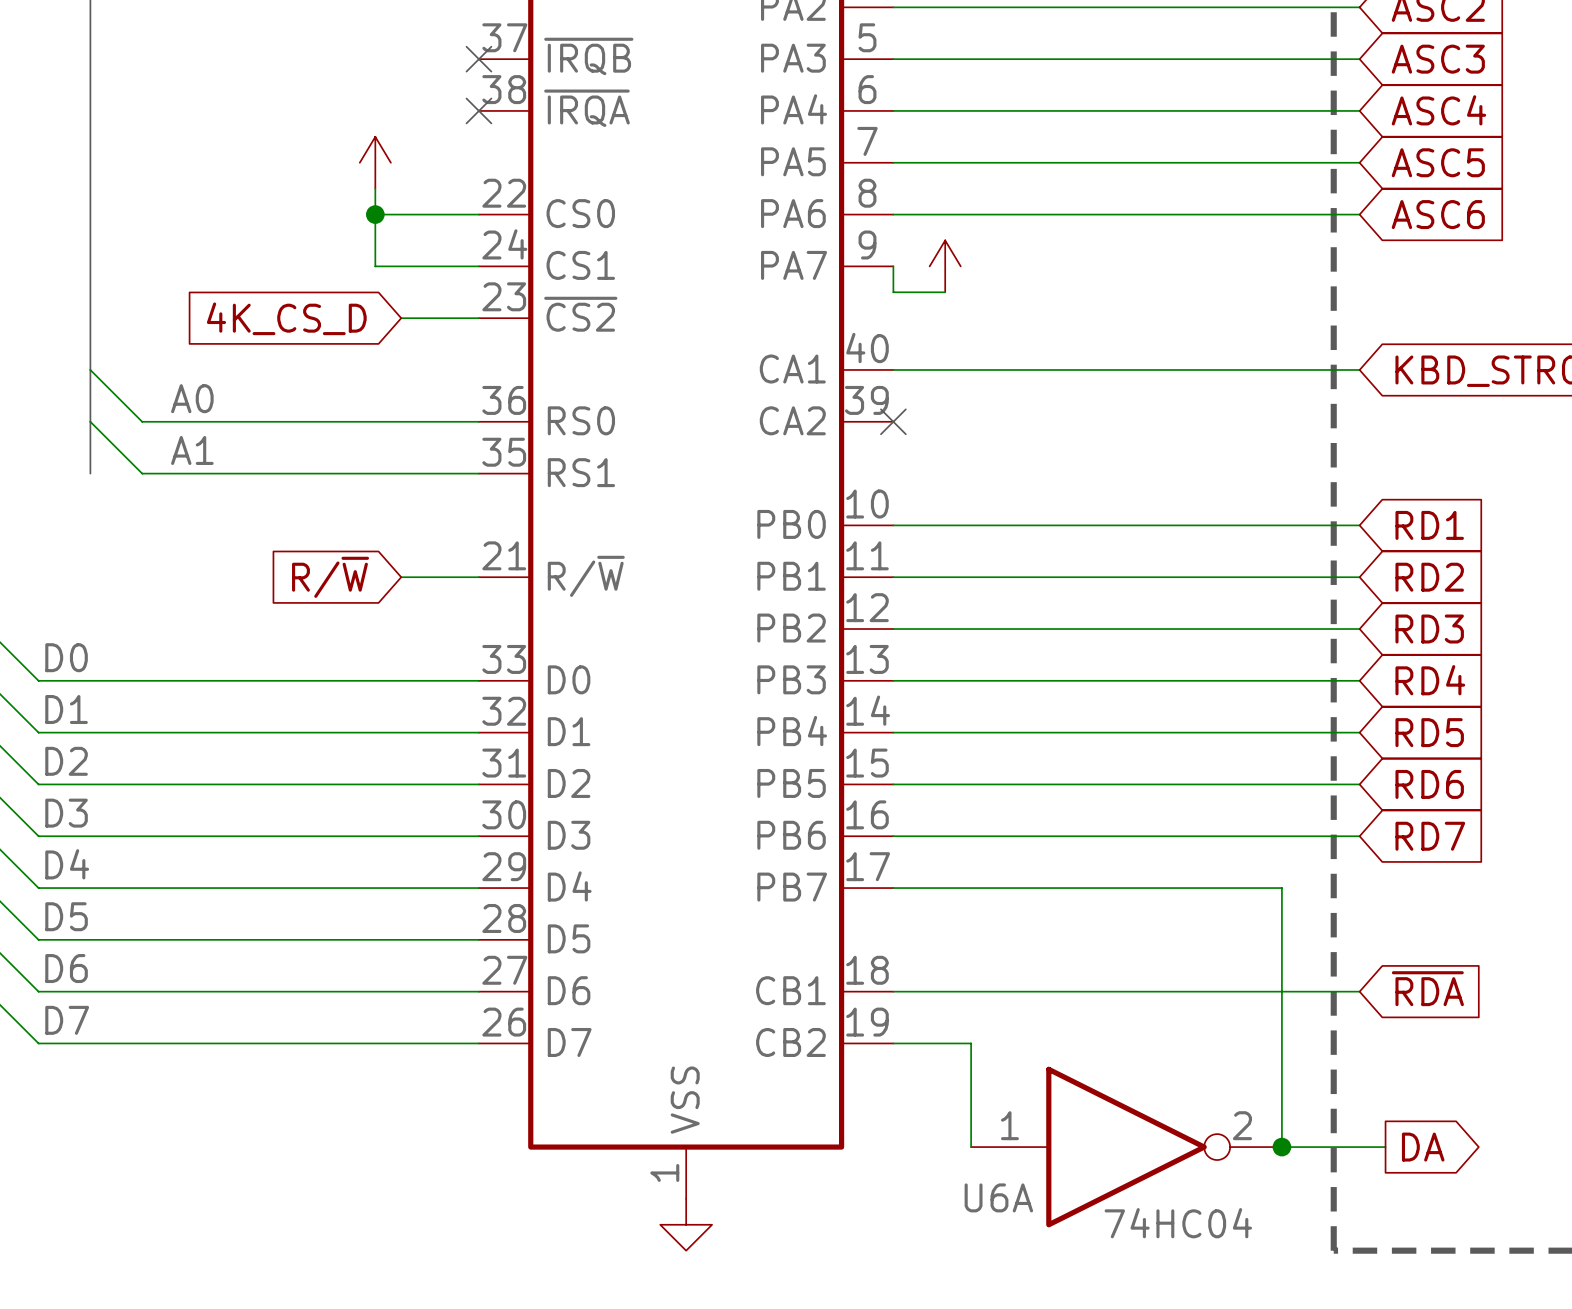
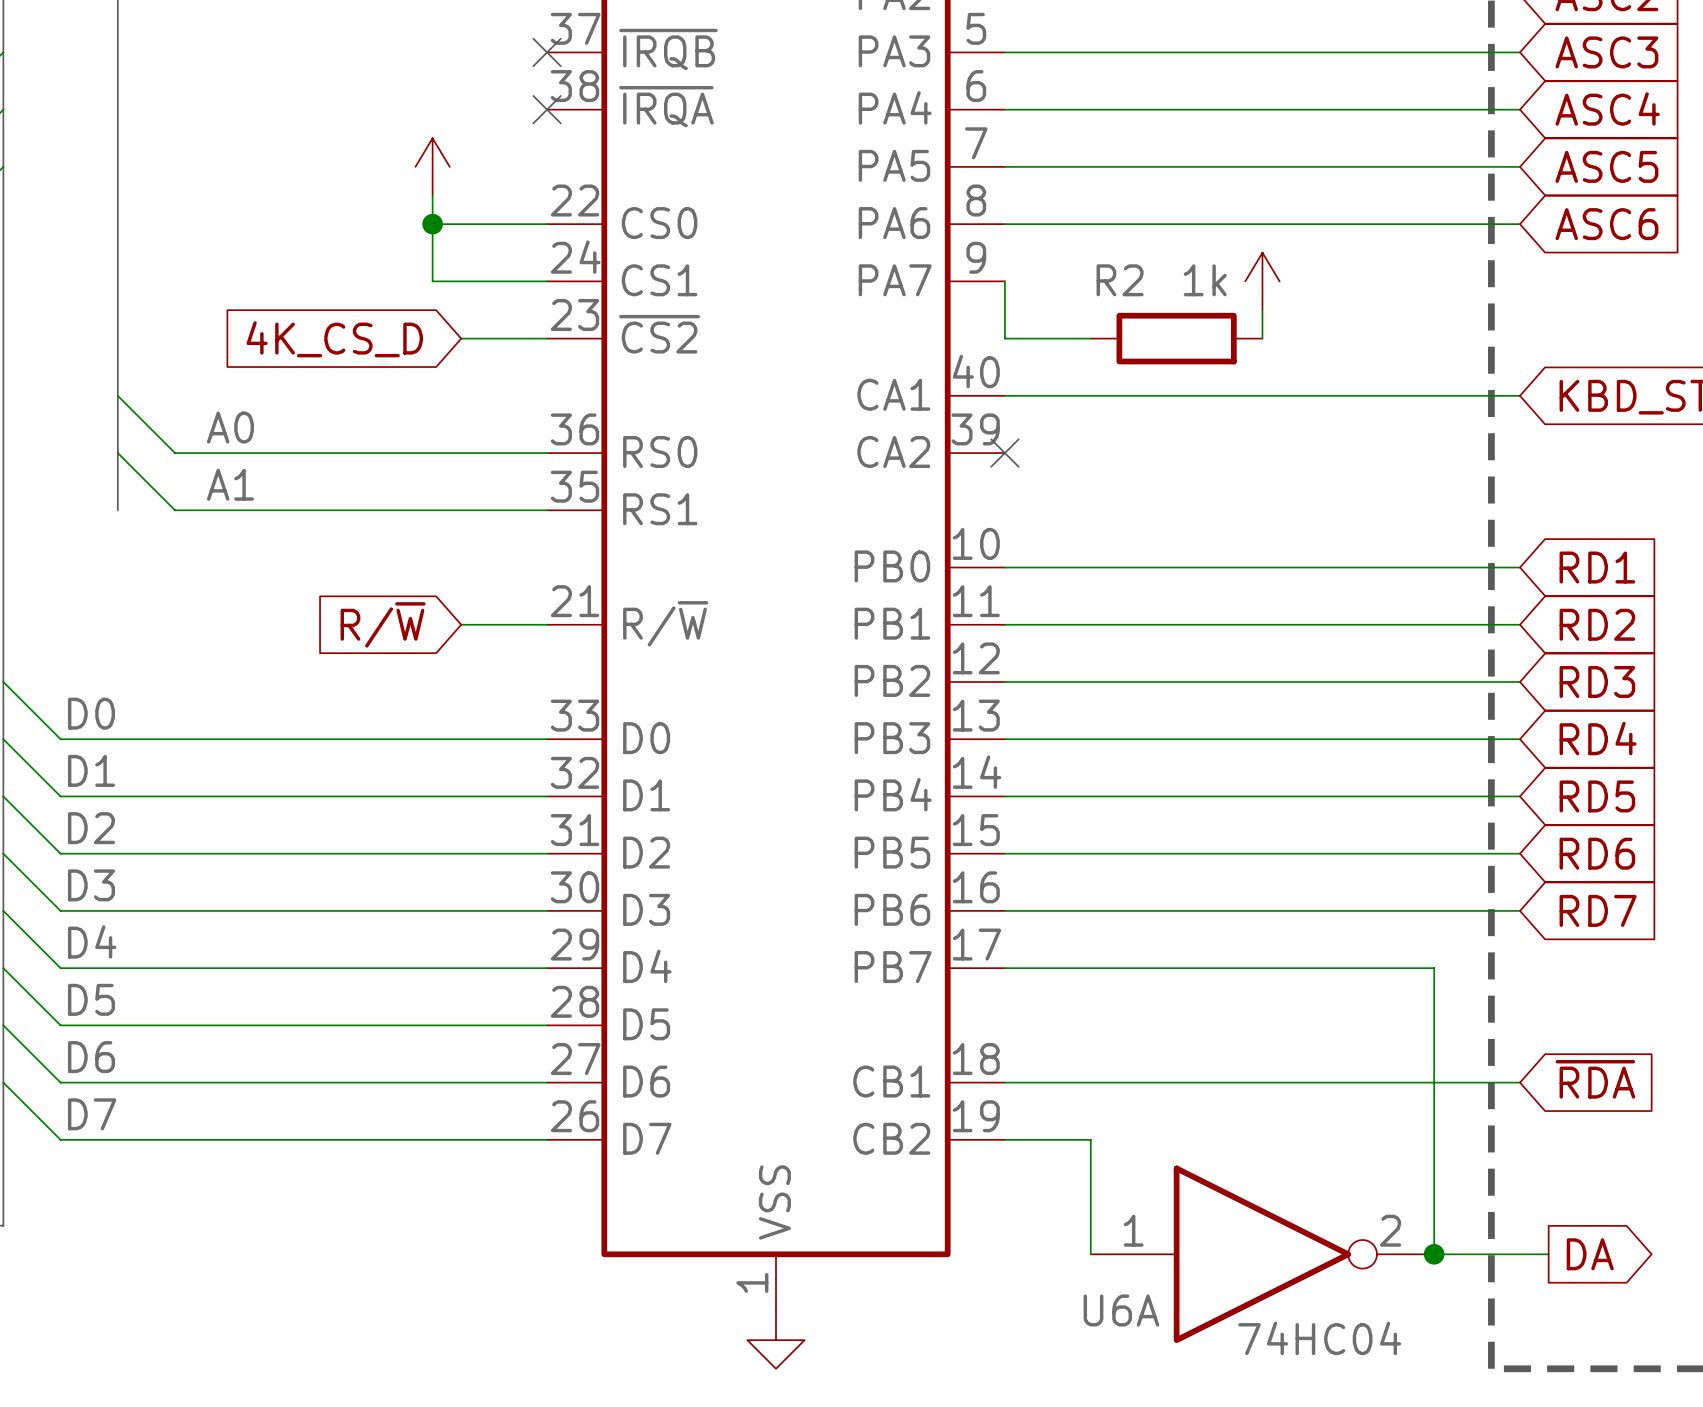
power symbol position: (945, 266) -> (1262, 281)
wire: (893, 292) (945, 292) -> (1004, 309) (1004, 338) (1090, 338)
wire: none -> (1262, 309) (1262, 338)
R2: none -> 1k (1176, 338)

